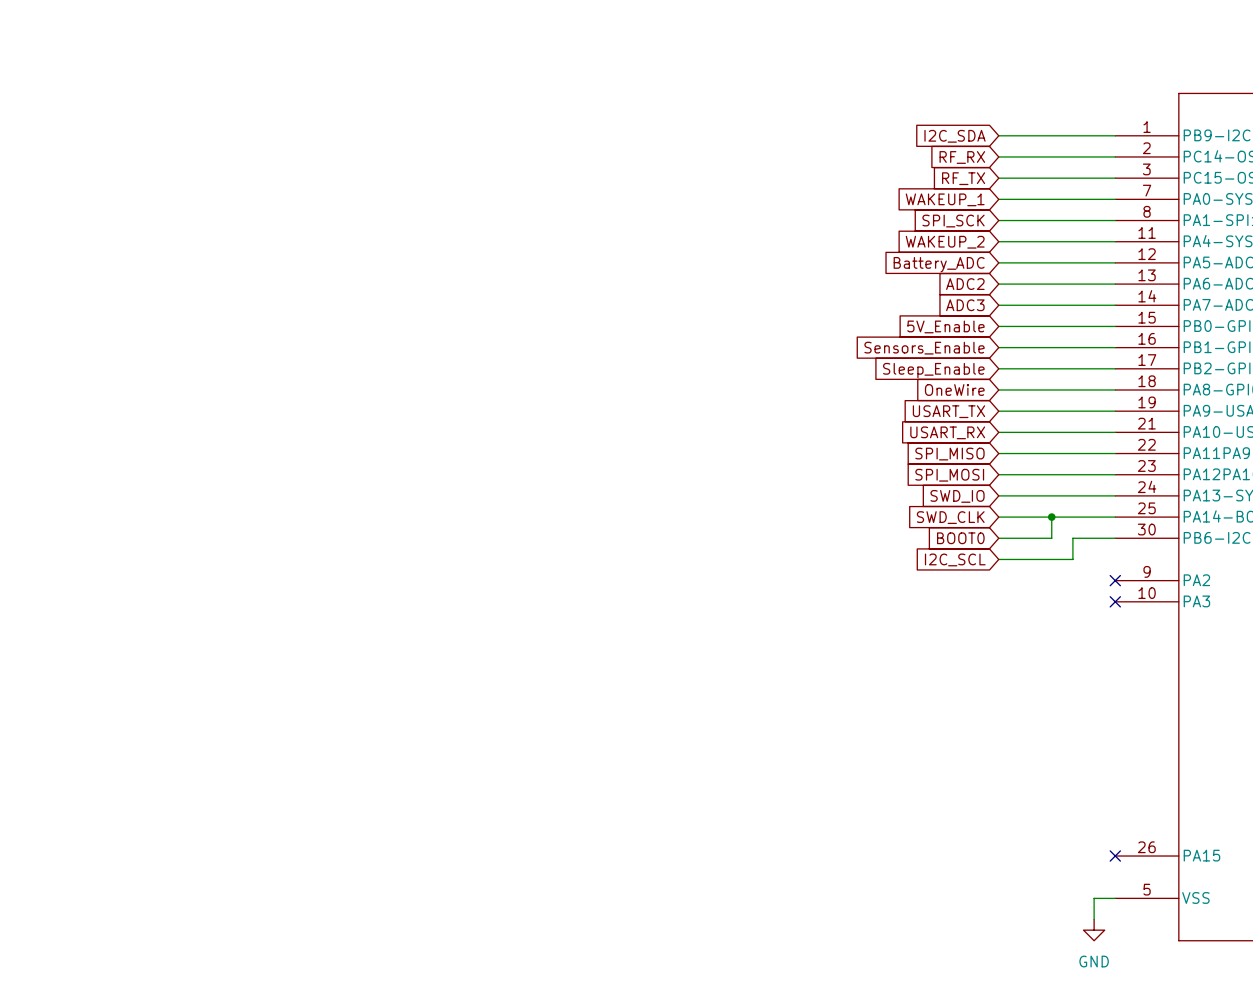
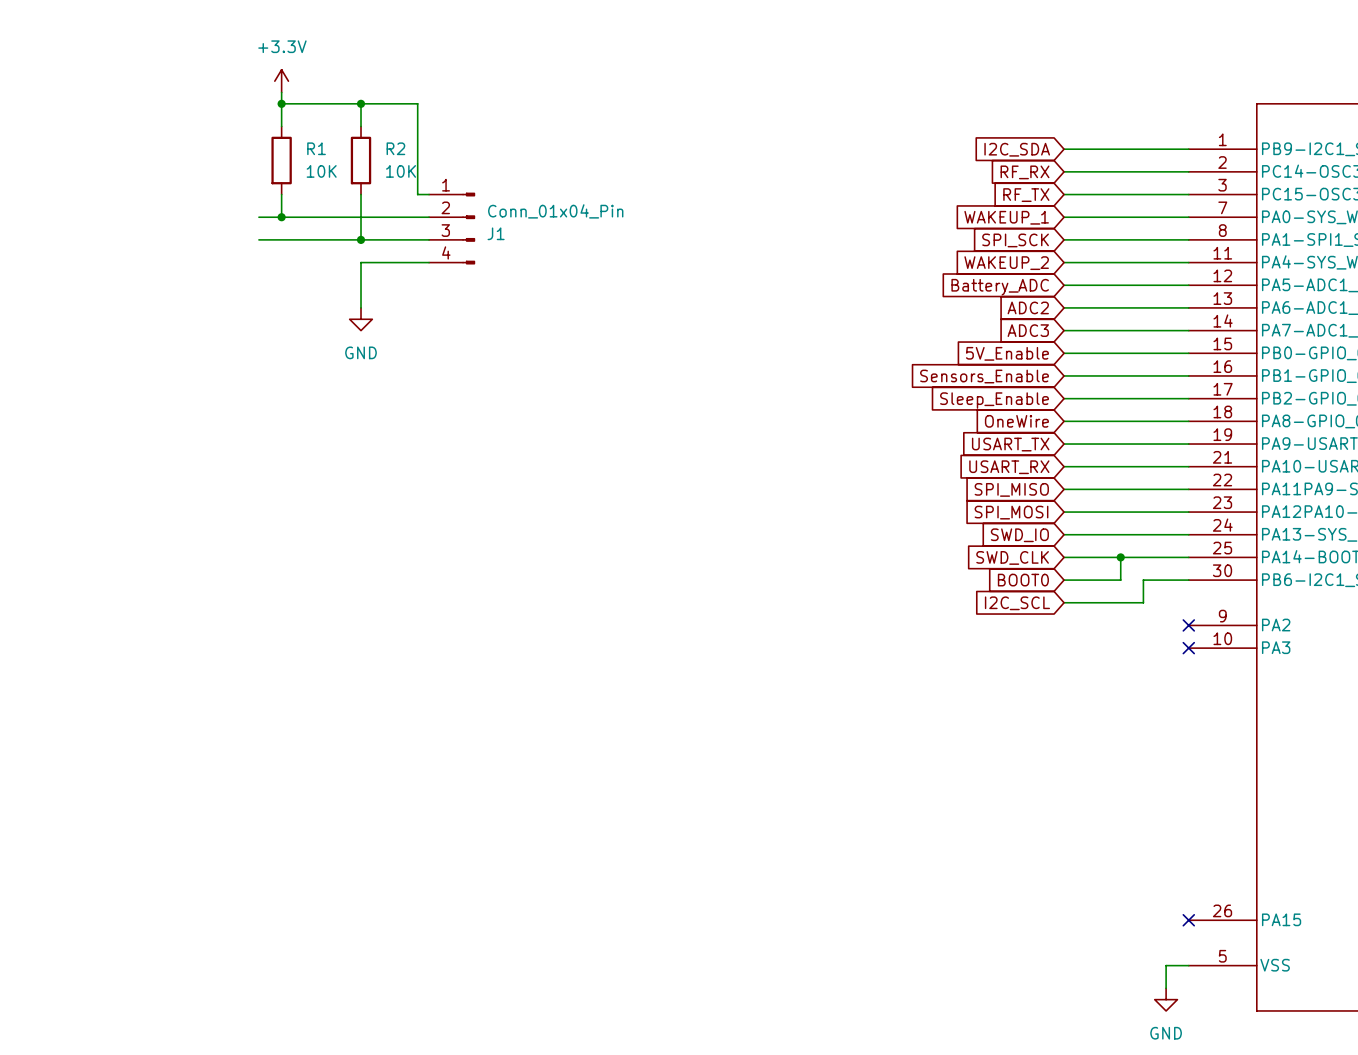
power symbol: none -> +3.3V (281, 81)
wire: none -> (281, 92) (281, 126)
wire: none -> (281, 103) (417, 103) (417, 194) (429, 194)
junction: none -> (281, 103)
wire: none -> (361, 103) (361, 126)
junction: none -> (361, 103)
R1: none -> 10K (281, 160)
R2: none -> 10K (361, 160)
wire: none -> (281, 194) (281, 217)
wire: none -> (361, 194) (361, 239)
wire: none -> (258, 217) (429, 217)
junction: none -> (281, 217)
J1: none -> Conn_01x04_Pin (452, 228)
wire: none -> (258, 239) (429, 239)
junction: none -> (361, 239)
wire: none -> (429, 262) (361, 262) (361, 307)
power symbol: none -> GND (361, 319)

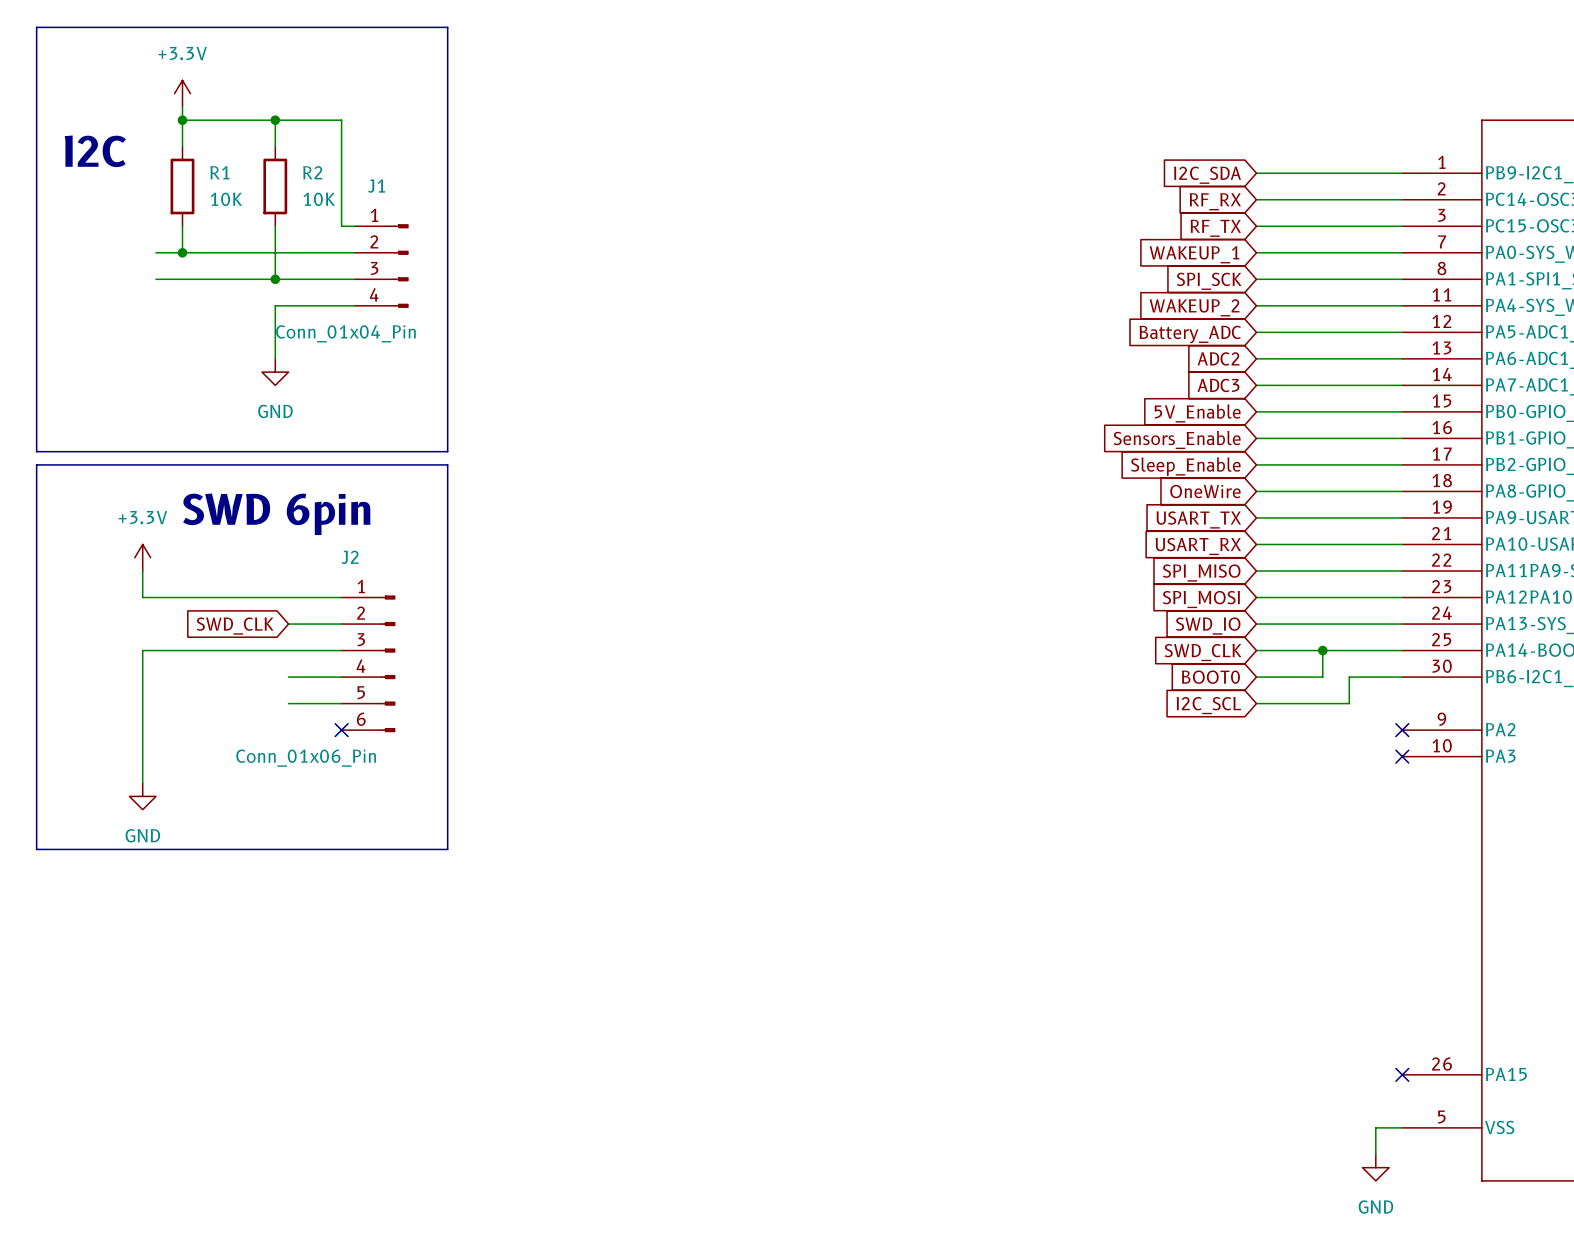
line: none -> (36, 27) (447, 27) (447, 451) (36, 451) (36, 27)
power symbol position: +3.3V (281, 81) -> +3.3V (182, 93)
wire: none -> (182, 106) (182, 146)
wire: (281, 92) (281, 103) (417, 103) (417, 194) (429, 194) -> none
wire: none -> (182, 120) (341, 120)
junction: none -> (182, 120)
junction: none -> (275, 120)
junction: (281, 103) -> none
wire: (361, 103) (361, 126) -> (275, 120) (275, 146)
junction: (361, 103) -> none
wire: none -> (341, 146) (341, 226) (354, 226)
text: none -> I2C (95, 151)
R1 position: (281, 160) -> (182, 186)
R2 position: (361, 160) -> (275, 186)
wire: (281, 194) (281, 217) -> (182, 226) (182, 252)
wire: (361, 194) (361, 239) -> (275, 226) (275, 279)
J1 value position: Conn_01x04_Pin (555, 211) -> Conn_01x04_Pin (345, 333)
junction: none -> (182, 252)
junction: (281, 217) -> none
wire: (292, 217) (429, 217) -> (155, 252) (315, 252)
J1 position: (452, 228) -> (381, 266)
J1 name position: J1 (496, 233) -> J1 (376, 186)
junction: none -> (275, 279)
wire: (292, 239) (429, 239) -> (155, 279) (315, 279)
junction: (361, 239) -> none
wire: (429, 262) (361, 262) (361, 307) -> (354, 305) (275, 305) (275, 358)
power symbol position: GND (361, 319) -> GND (275, 372)
line: none -> (36, 464) (36, 849) (447, 849) (447, 464) (36, 464)
text: none -> SWD 6pin (276, 514)
power symbol: none -> +3.3V (142, 557)
wire: none -> (142, 571) (142, 597) (341, 597)
wire: none -> (288, 624) (341, 624)
global label: none -> SWD_CLK (235, 626)
wire: none -> (341, 650) (142, 650) (142, 783)
J2: none -> Conn_01x06_Pin (368, 663)
wire: none -> (288, 677) (341, 677)
wire: none -> (288, 703) (341, 703)
no-connect mark: none -> (341, 730)
power symbol: none -> GND (142, 796)

